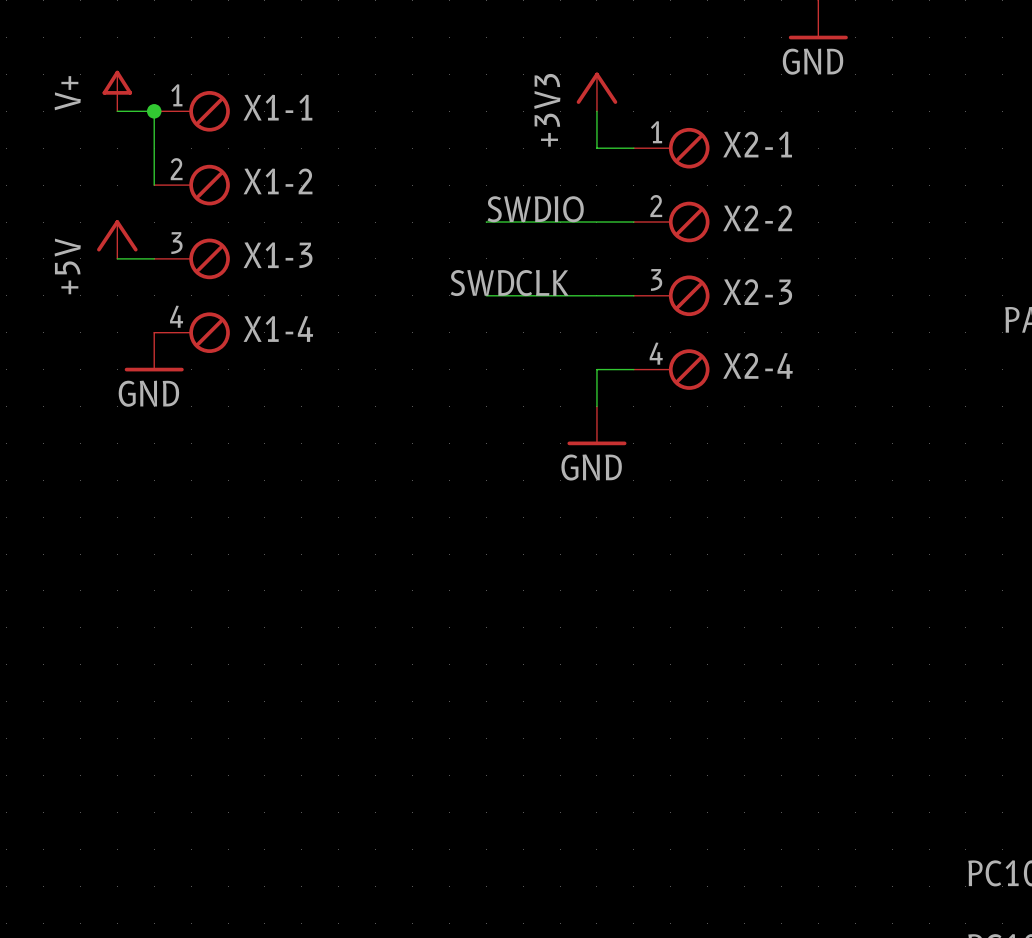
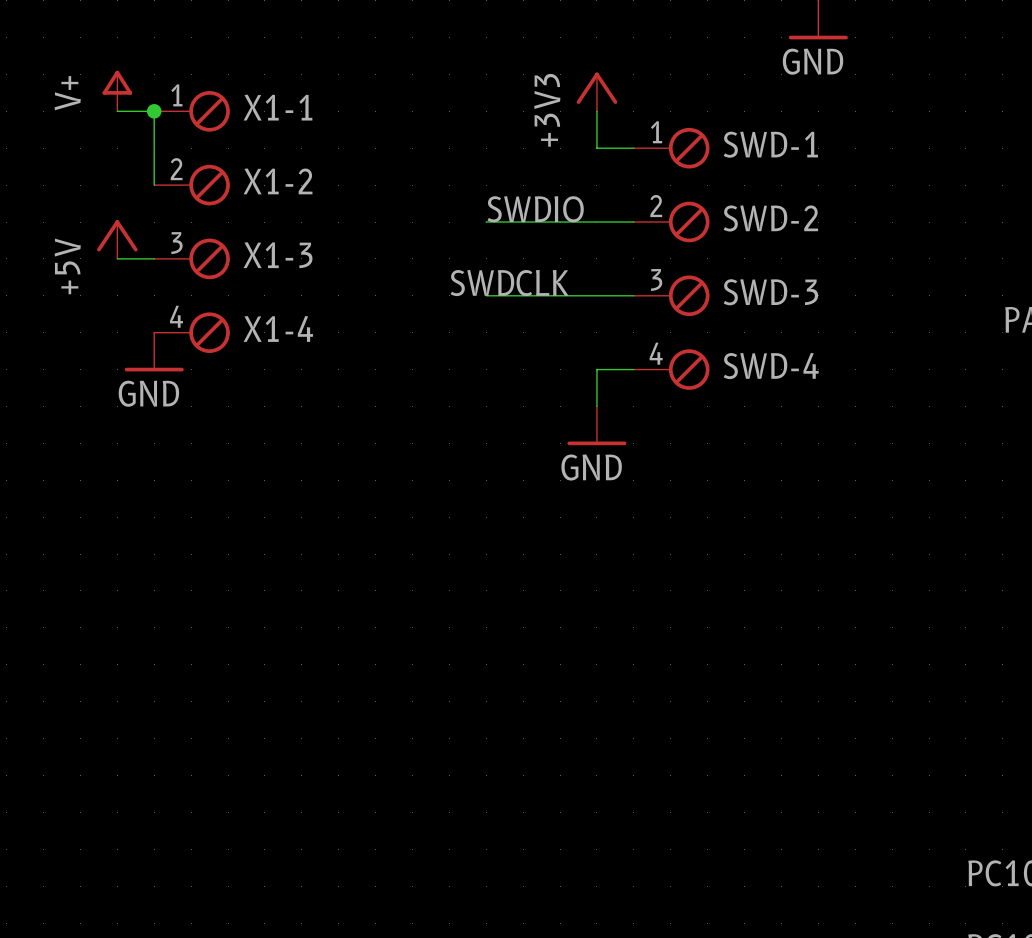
X2-1 name: X2-1 (757, 144) -> SWD-1 (770, 144)
X2-2 name: X2-2 (757, 218) -> SWD-2 (770, 218)
X2-3 name: X2-3 (757, 292) -> SWD-3 (770, 292)
X2-4 name: X2-4 (757, 365) -> SWD-4 (771, 366)

